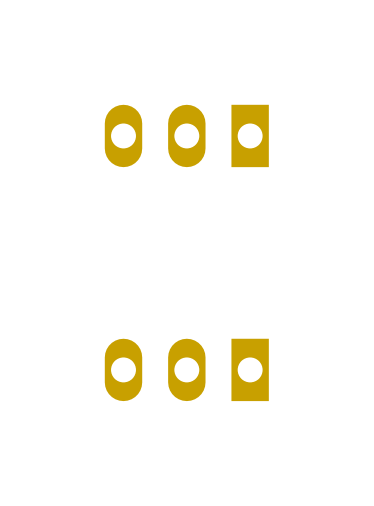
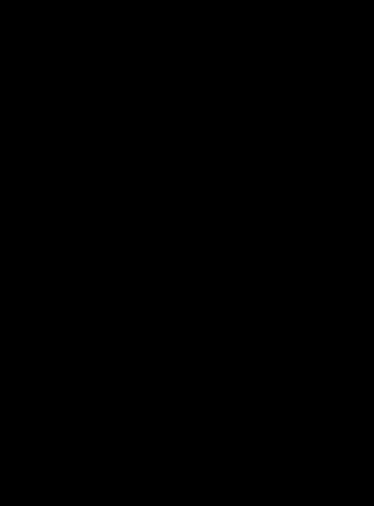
part: (186, 135) -> none
part: (186, 369) -> none

